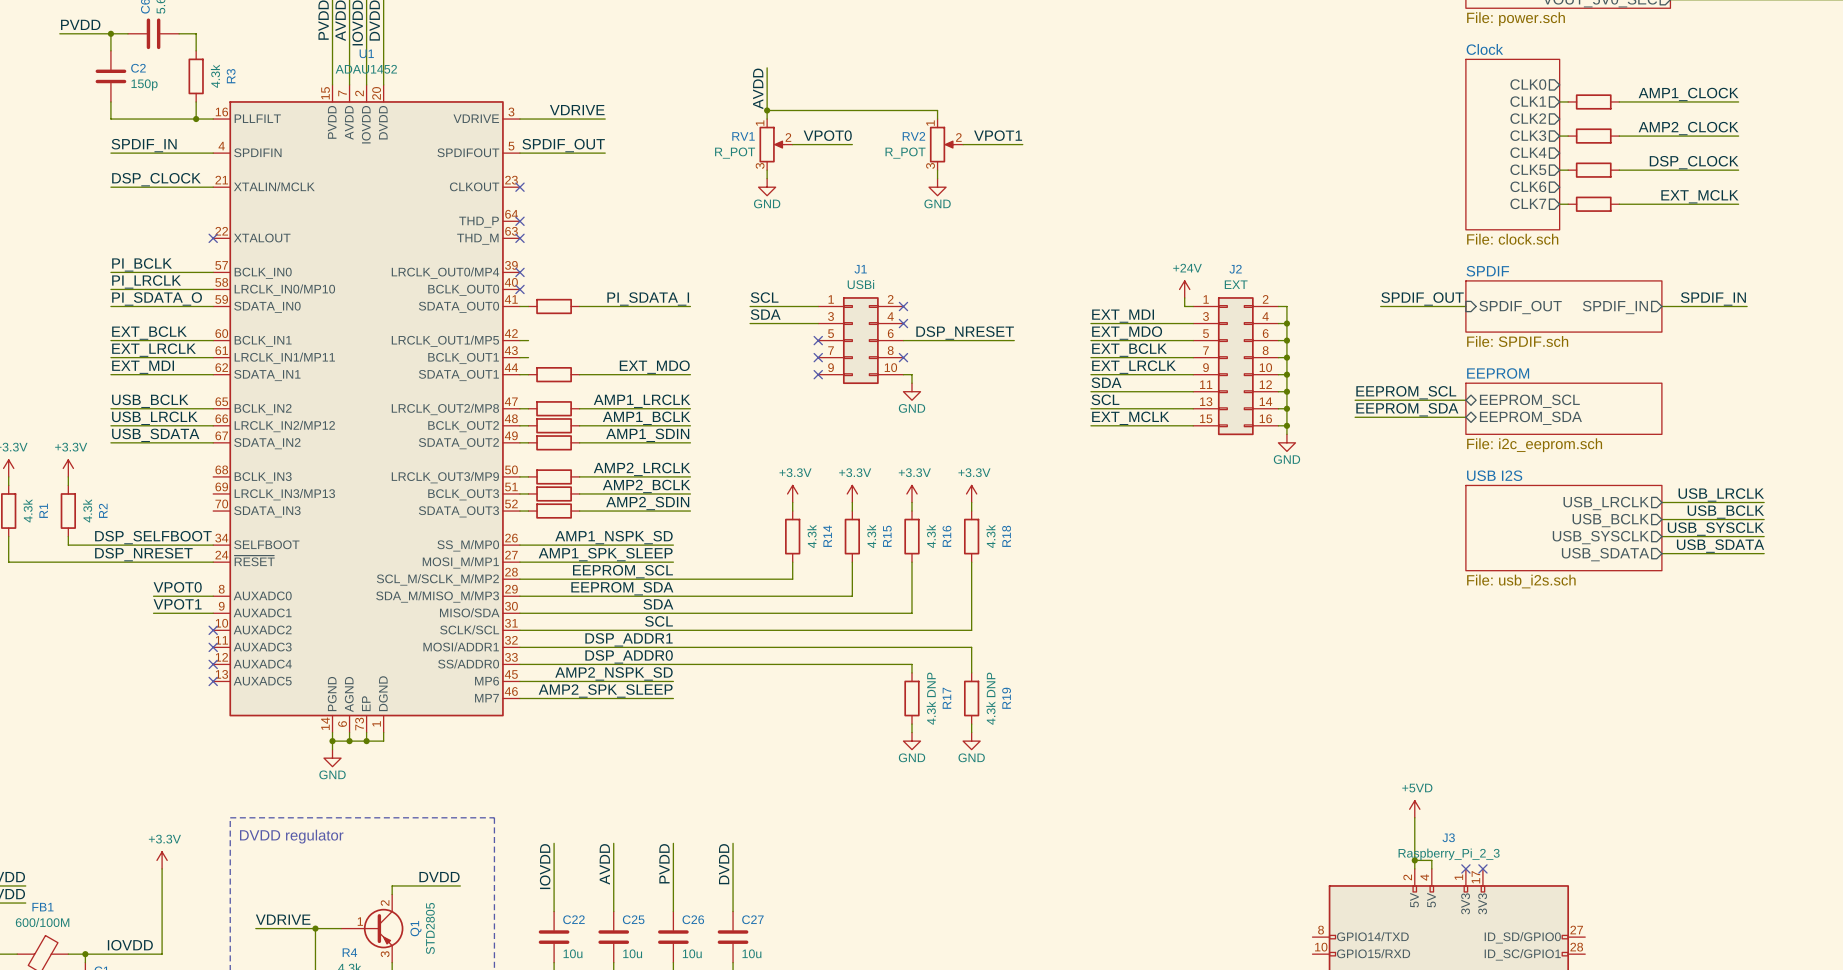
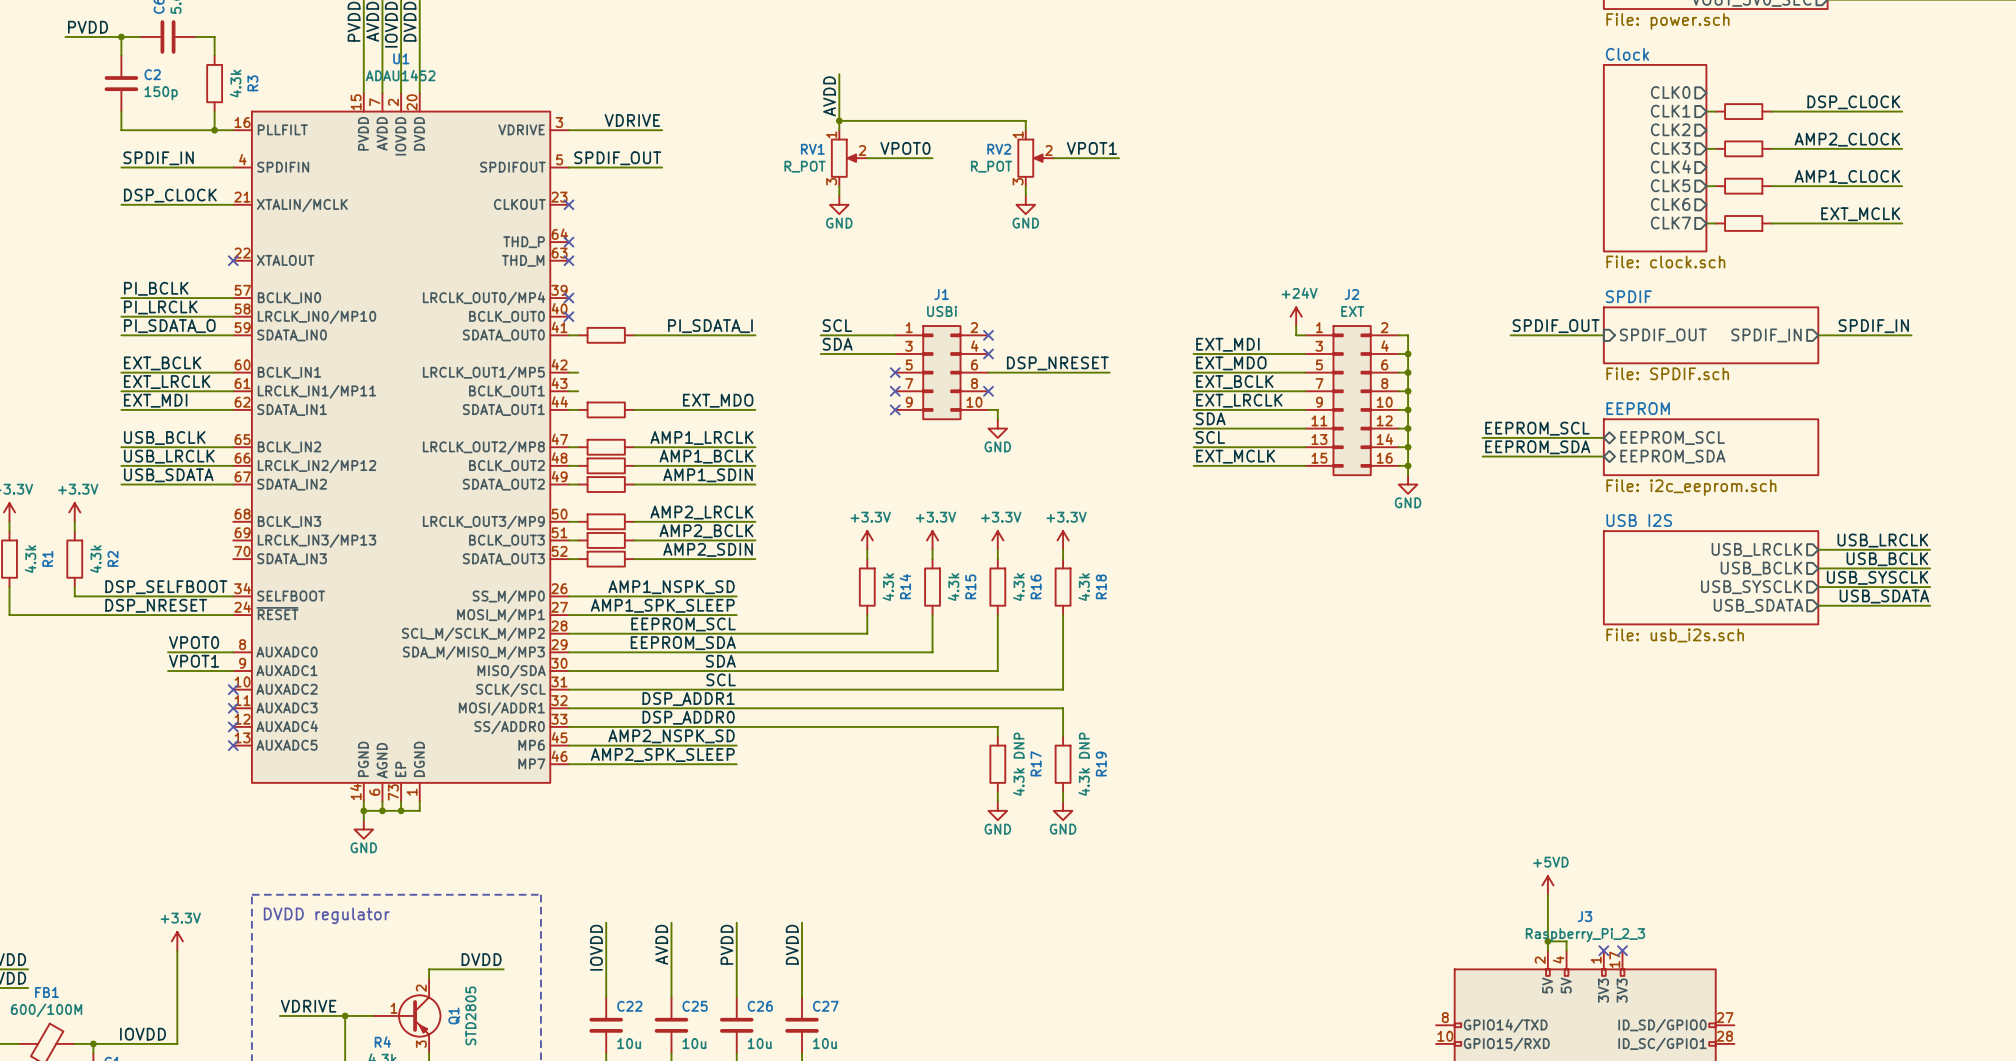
label: AMP1_CLOCK (1688, 94) -> DSP_CLOCK (1853, 102)
label: DSP_CLOCK (1694, 162) -> AMP1_CLOCK (1847, 176)

